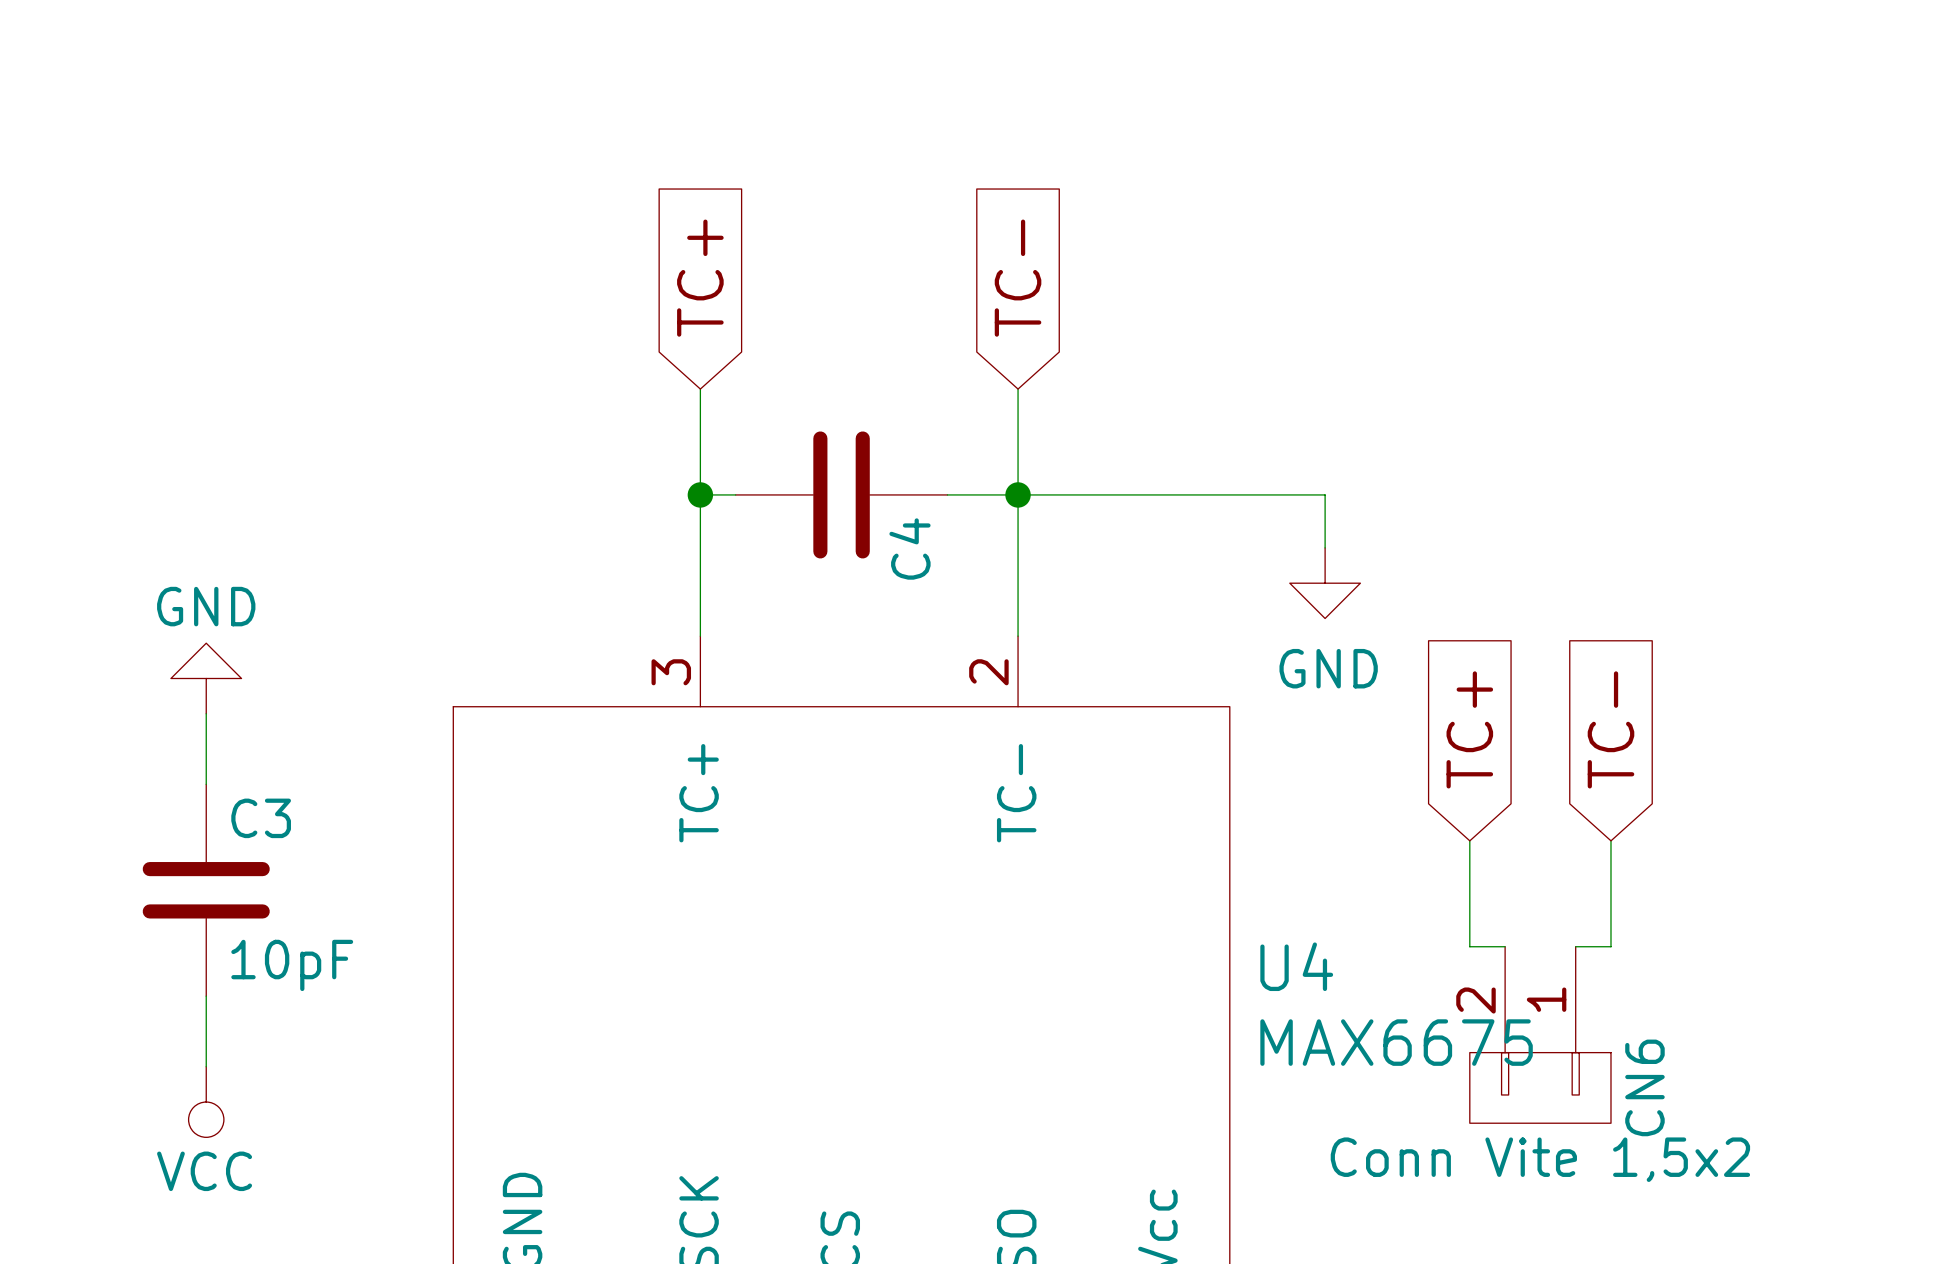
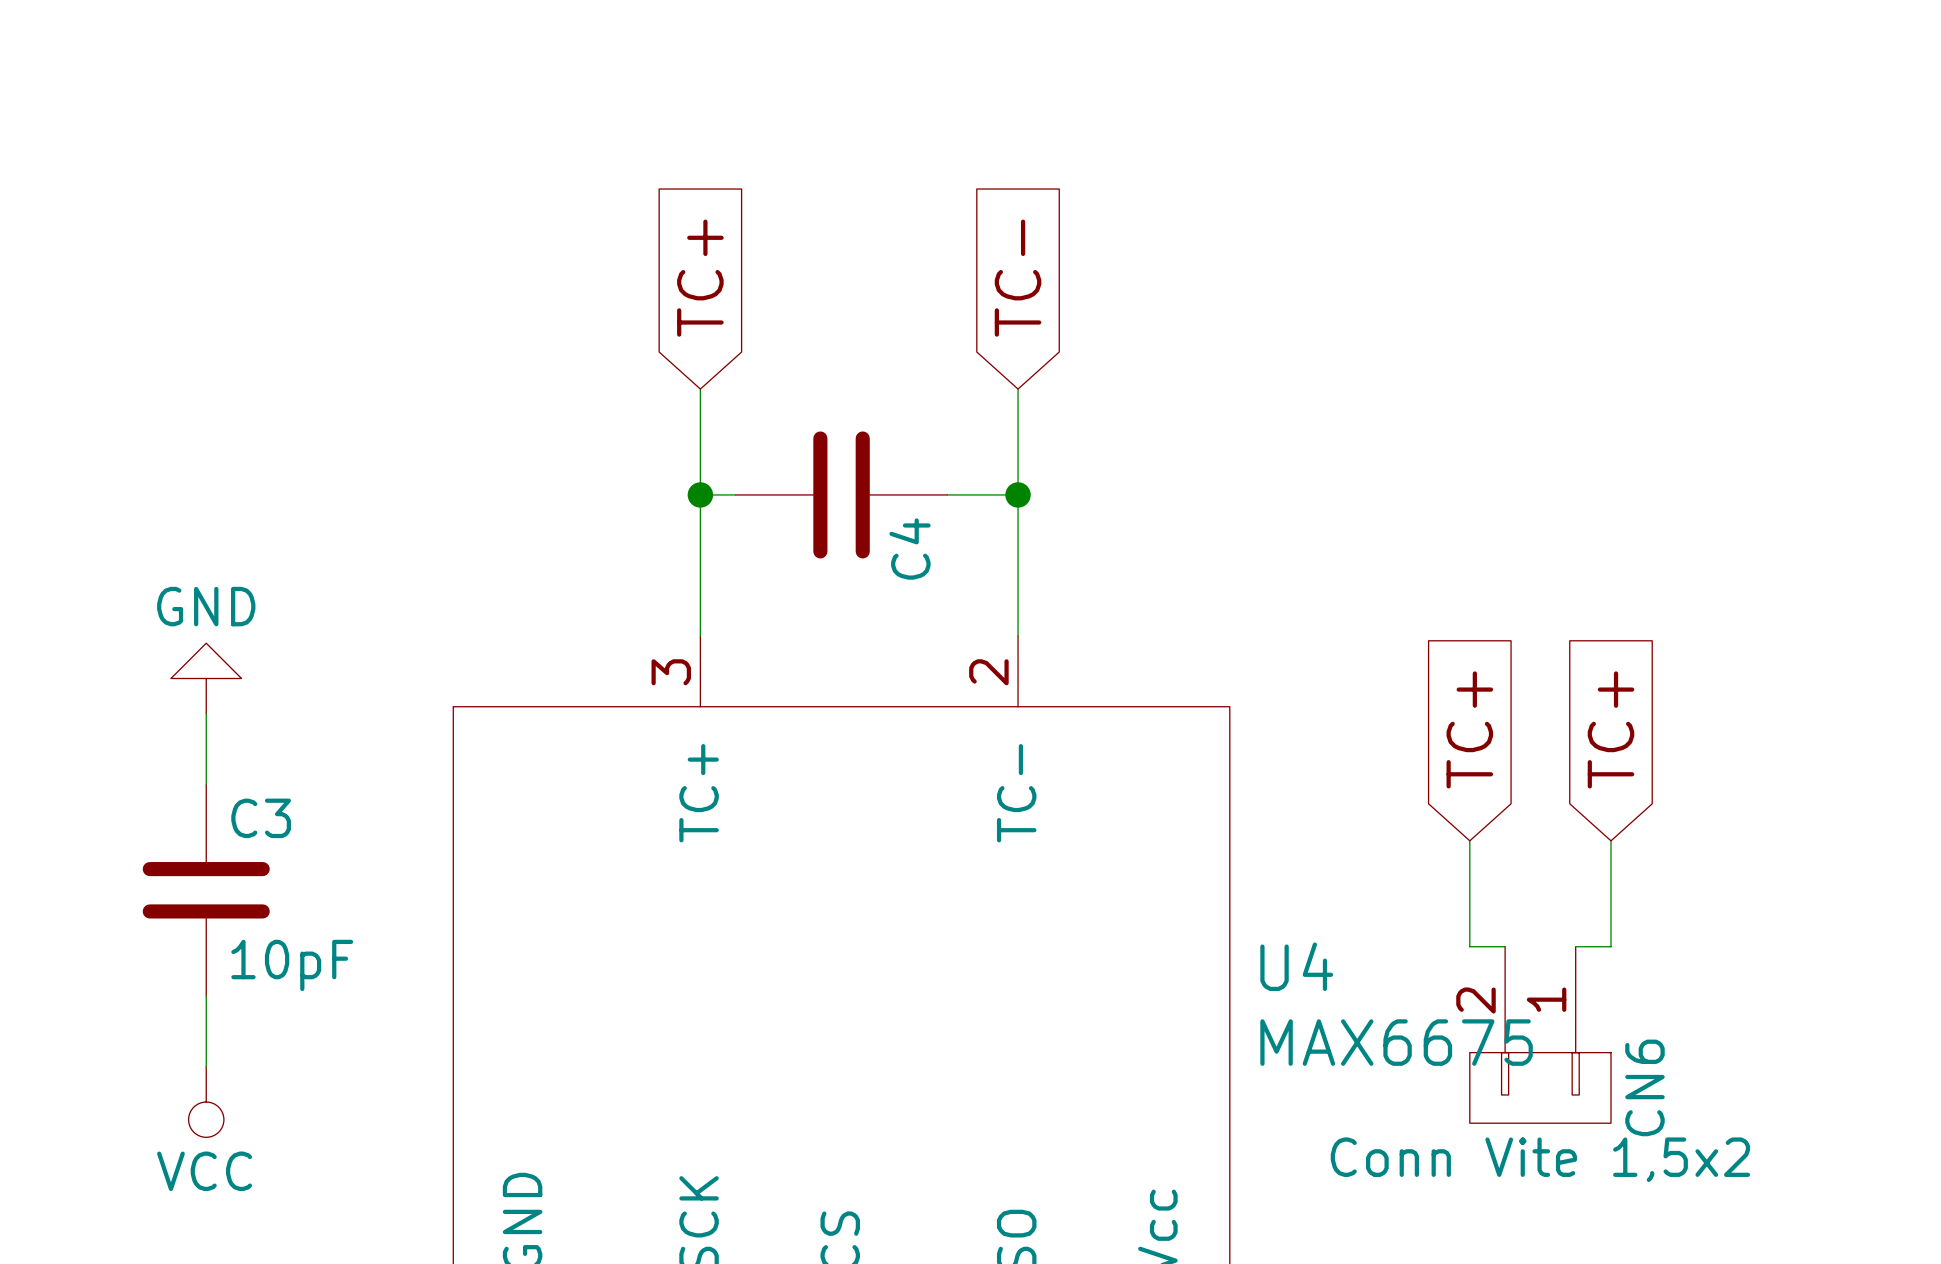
wire: (1018, 494) (1325, 494) (1325, 547) -> none
power symbol: GND (1325, 583) -> none
global label: TC- (1610, 729) -> TC+ (1610, 729)

